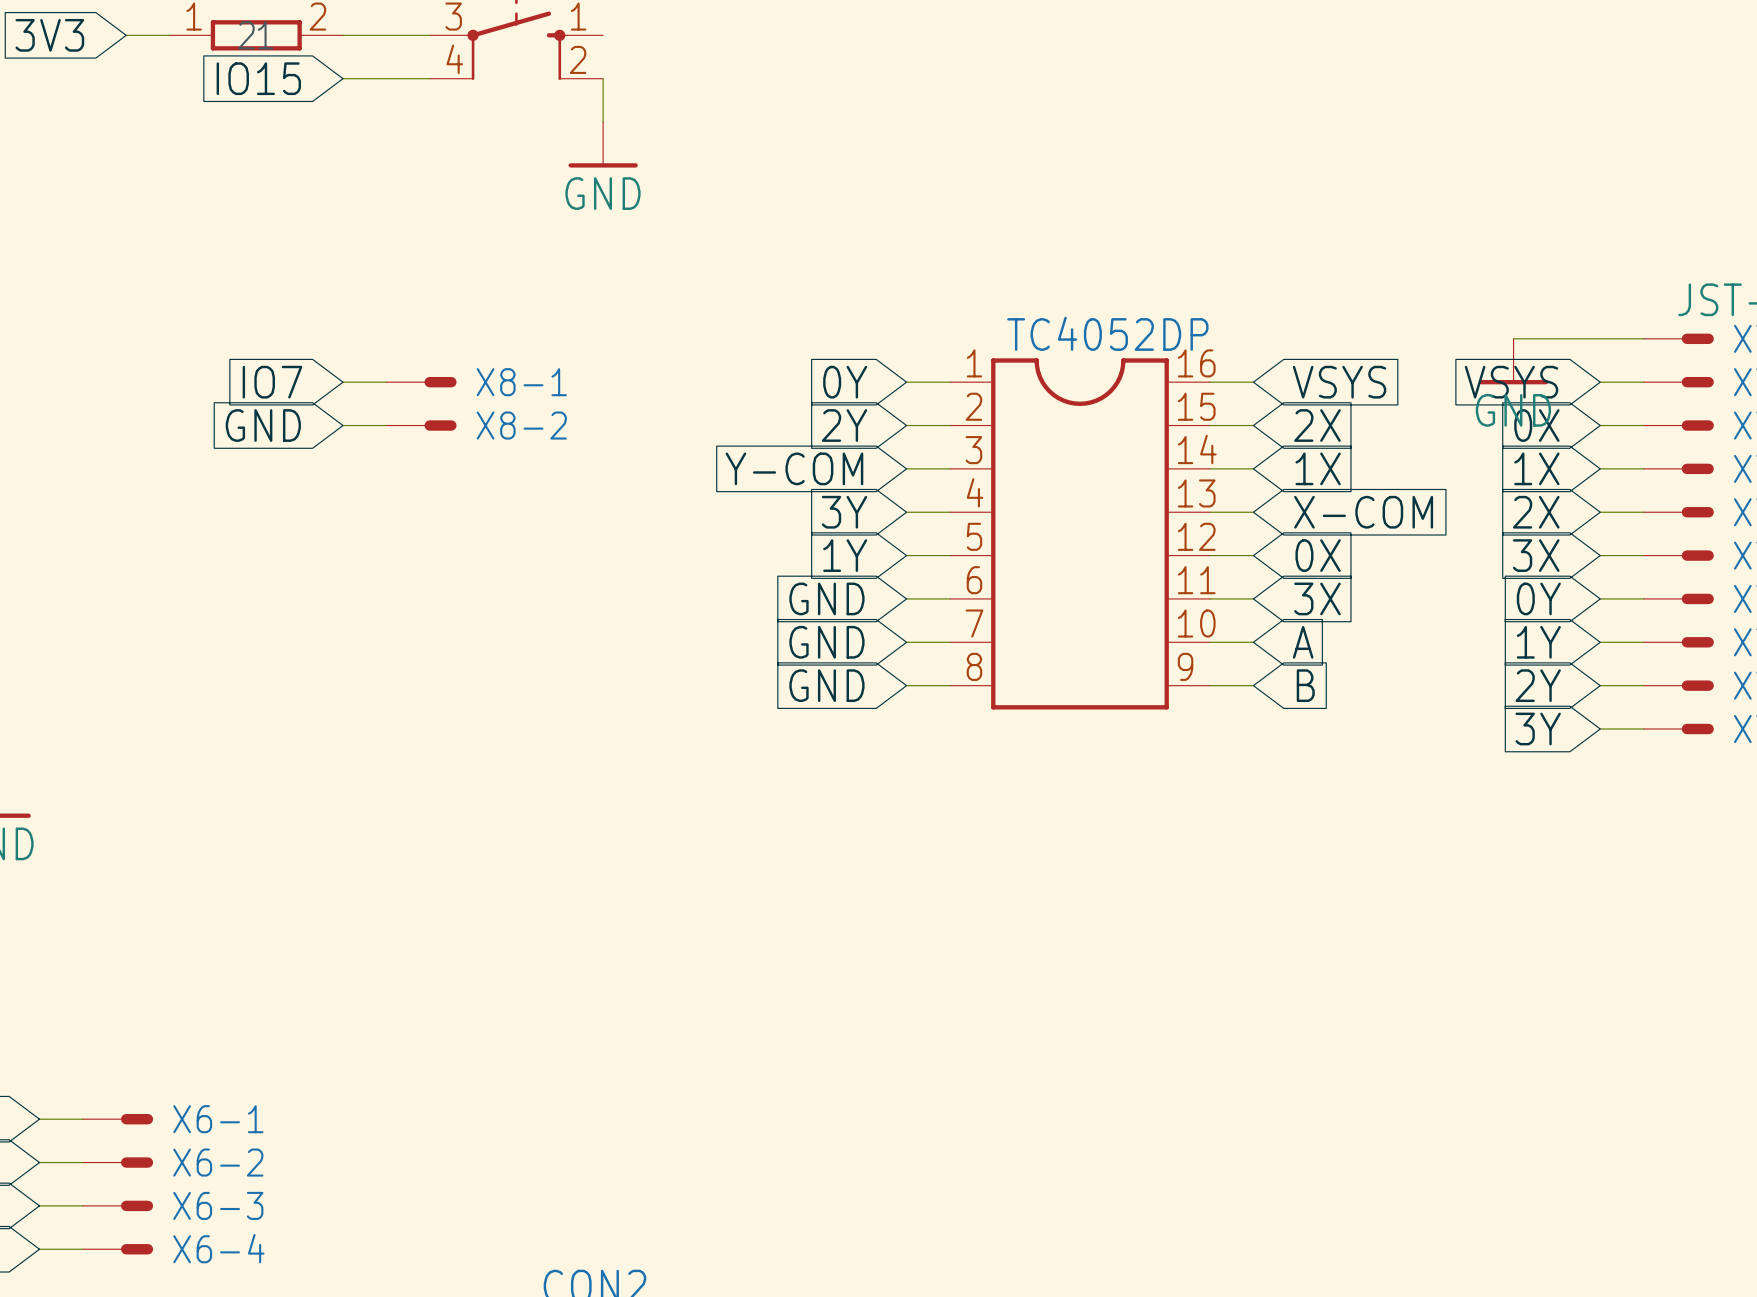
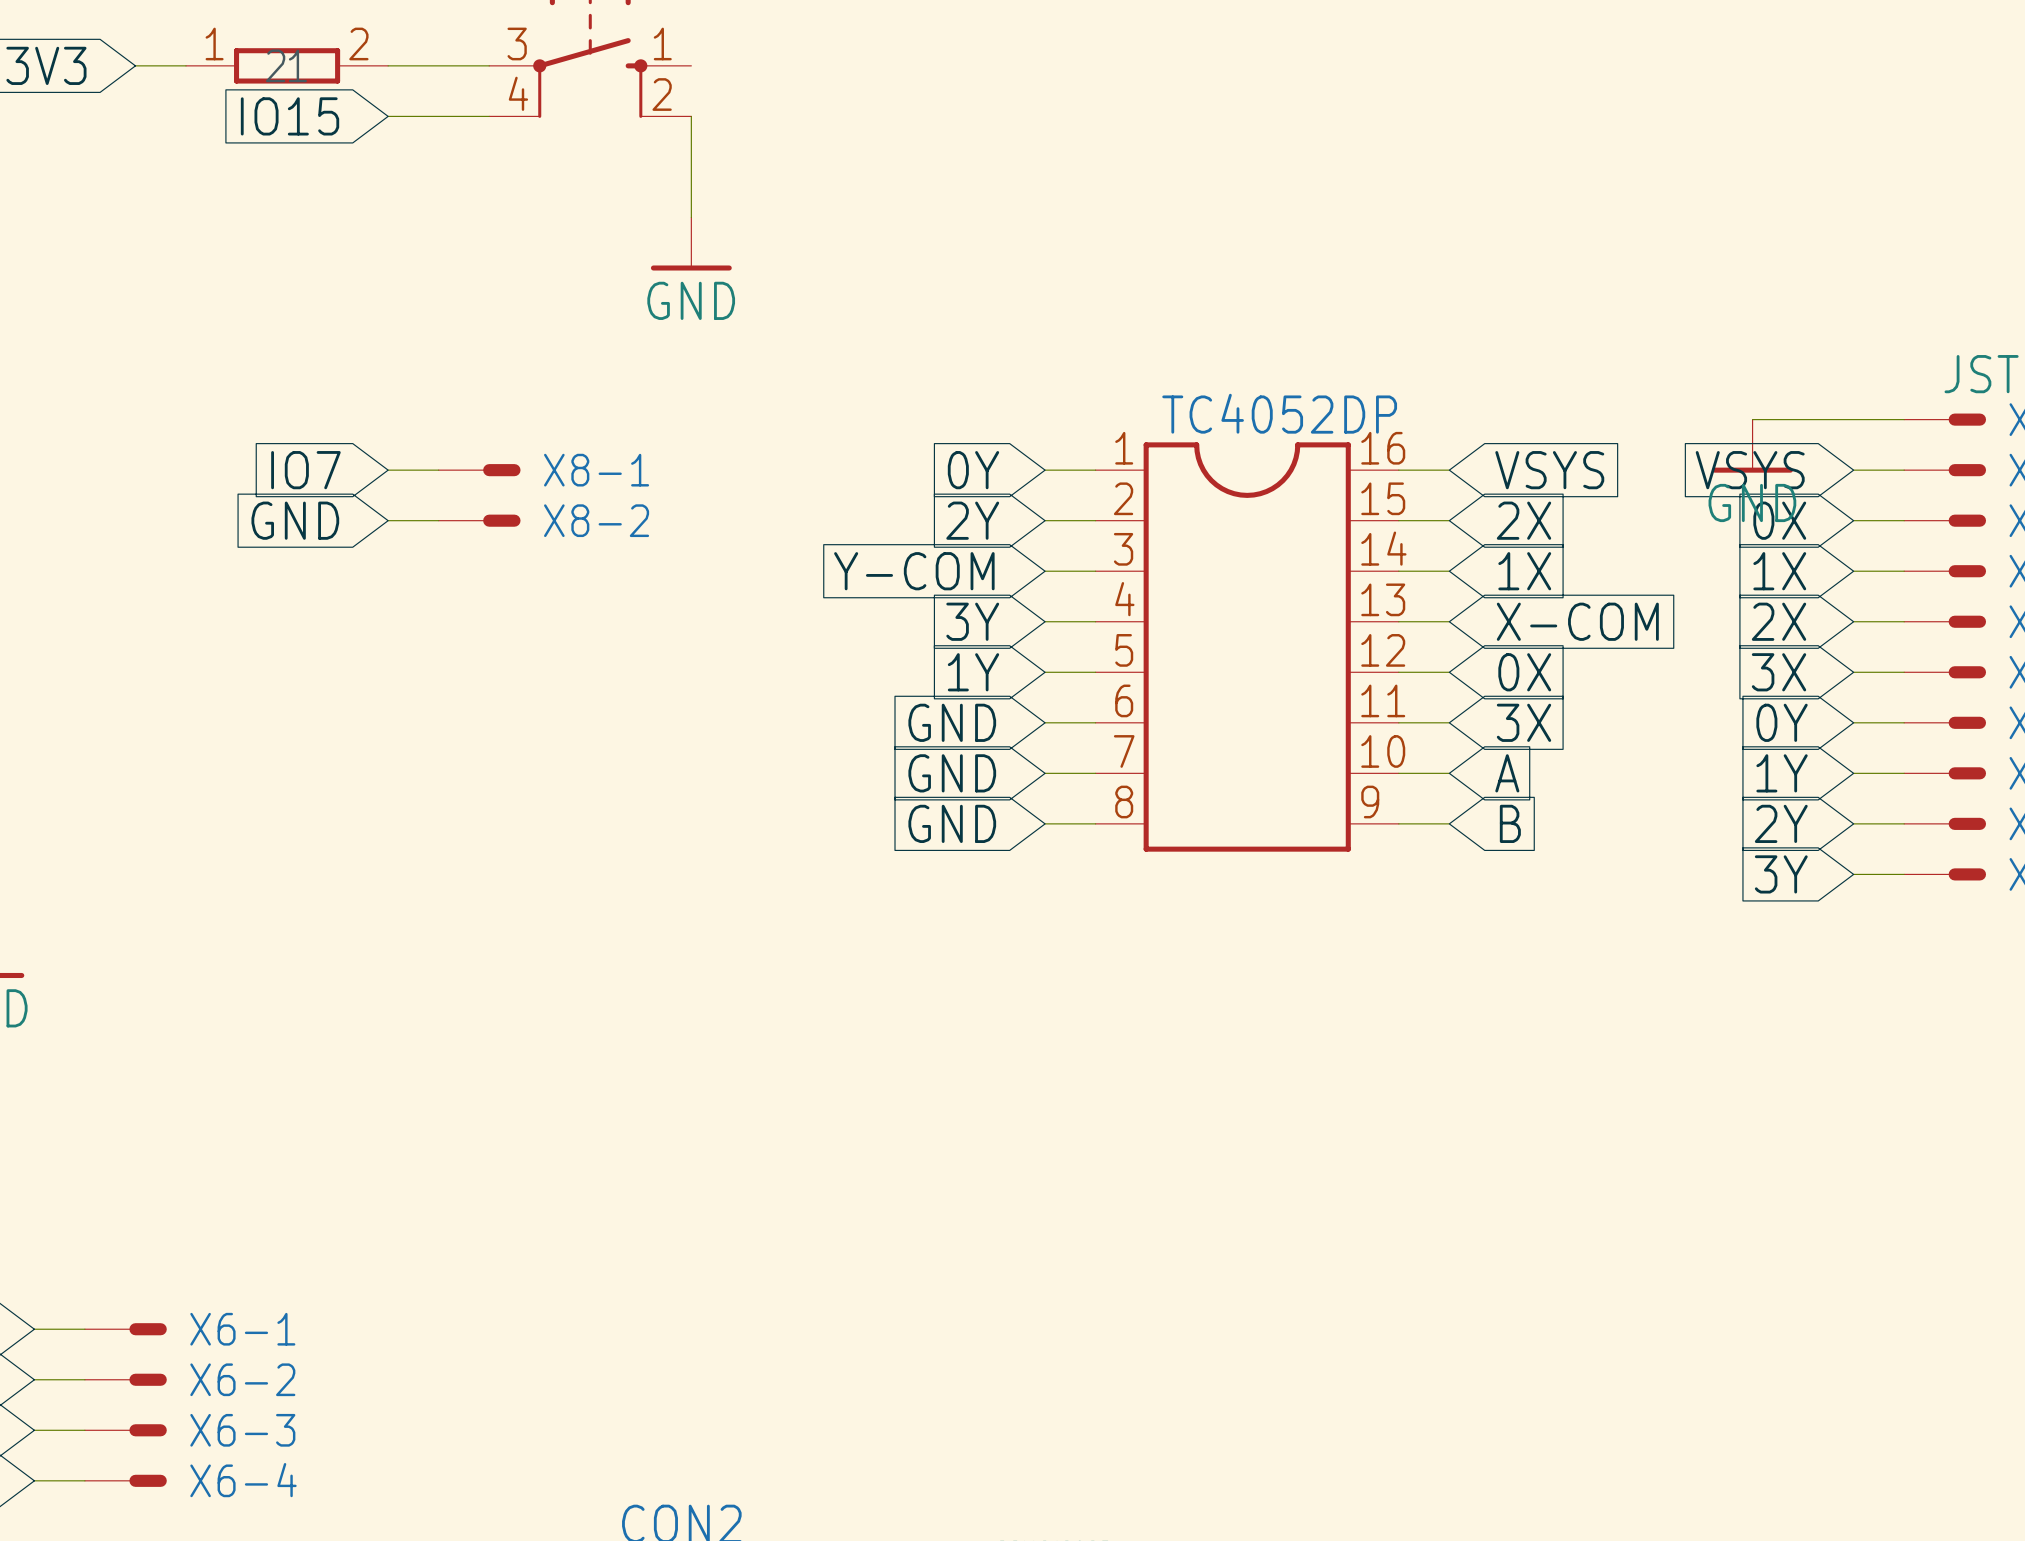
power symbol position: GND (603, 144) -> GND (691, 244)

